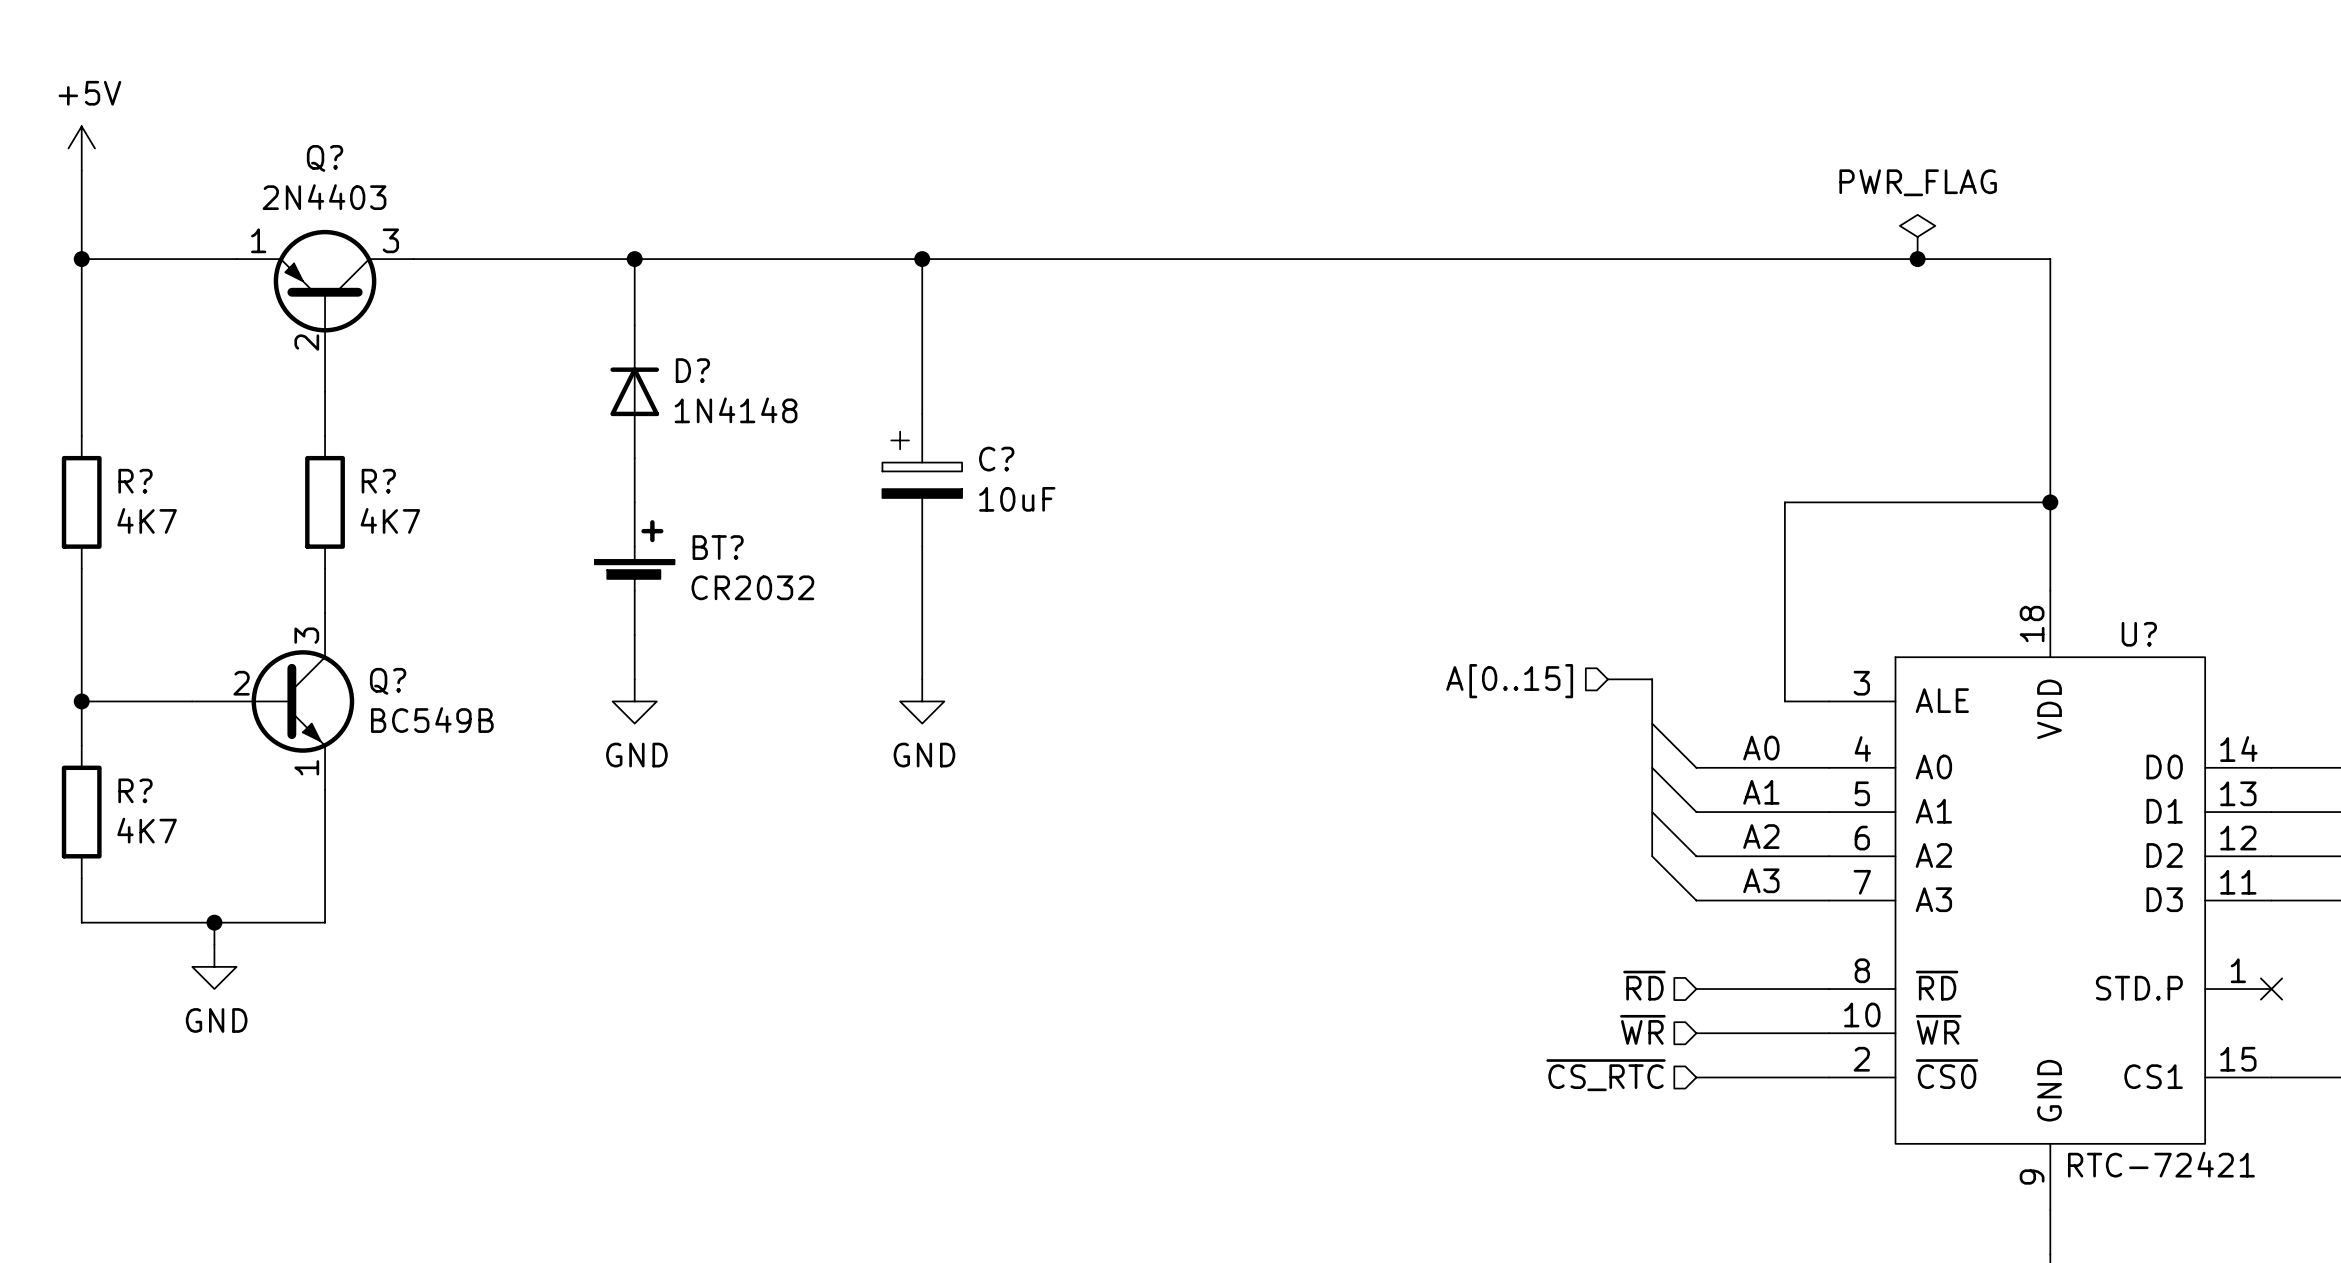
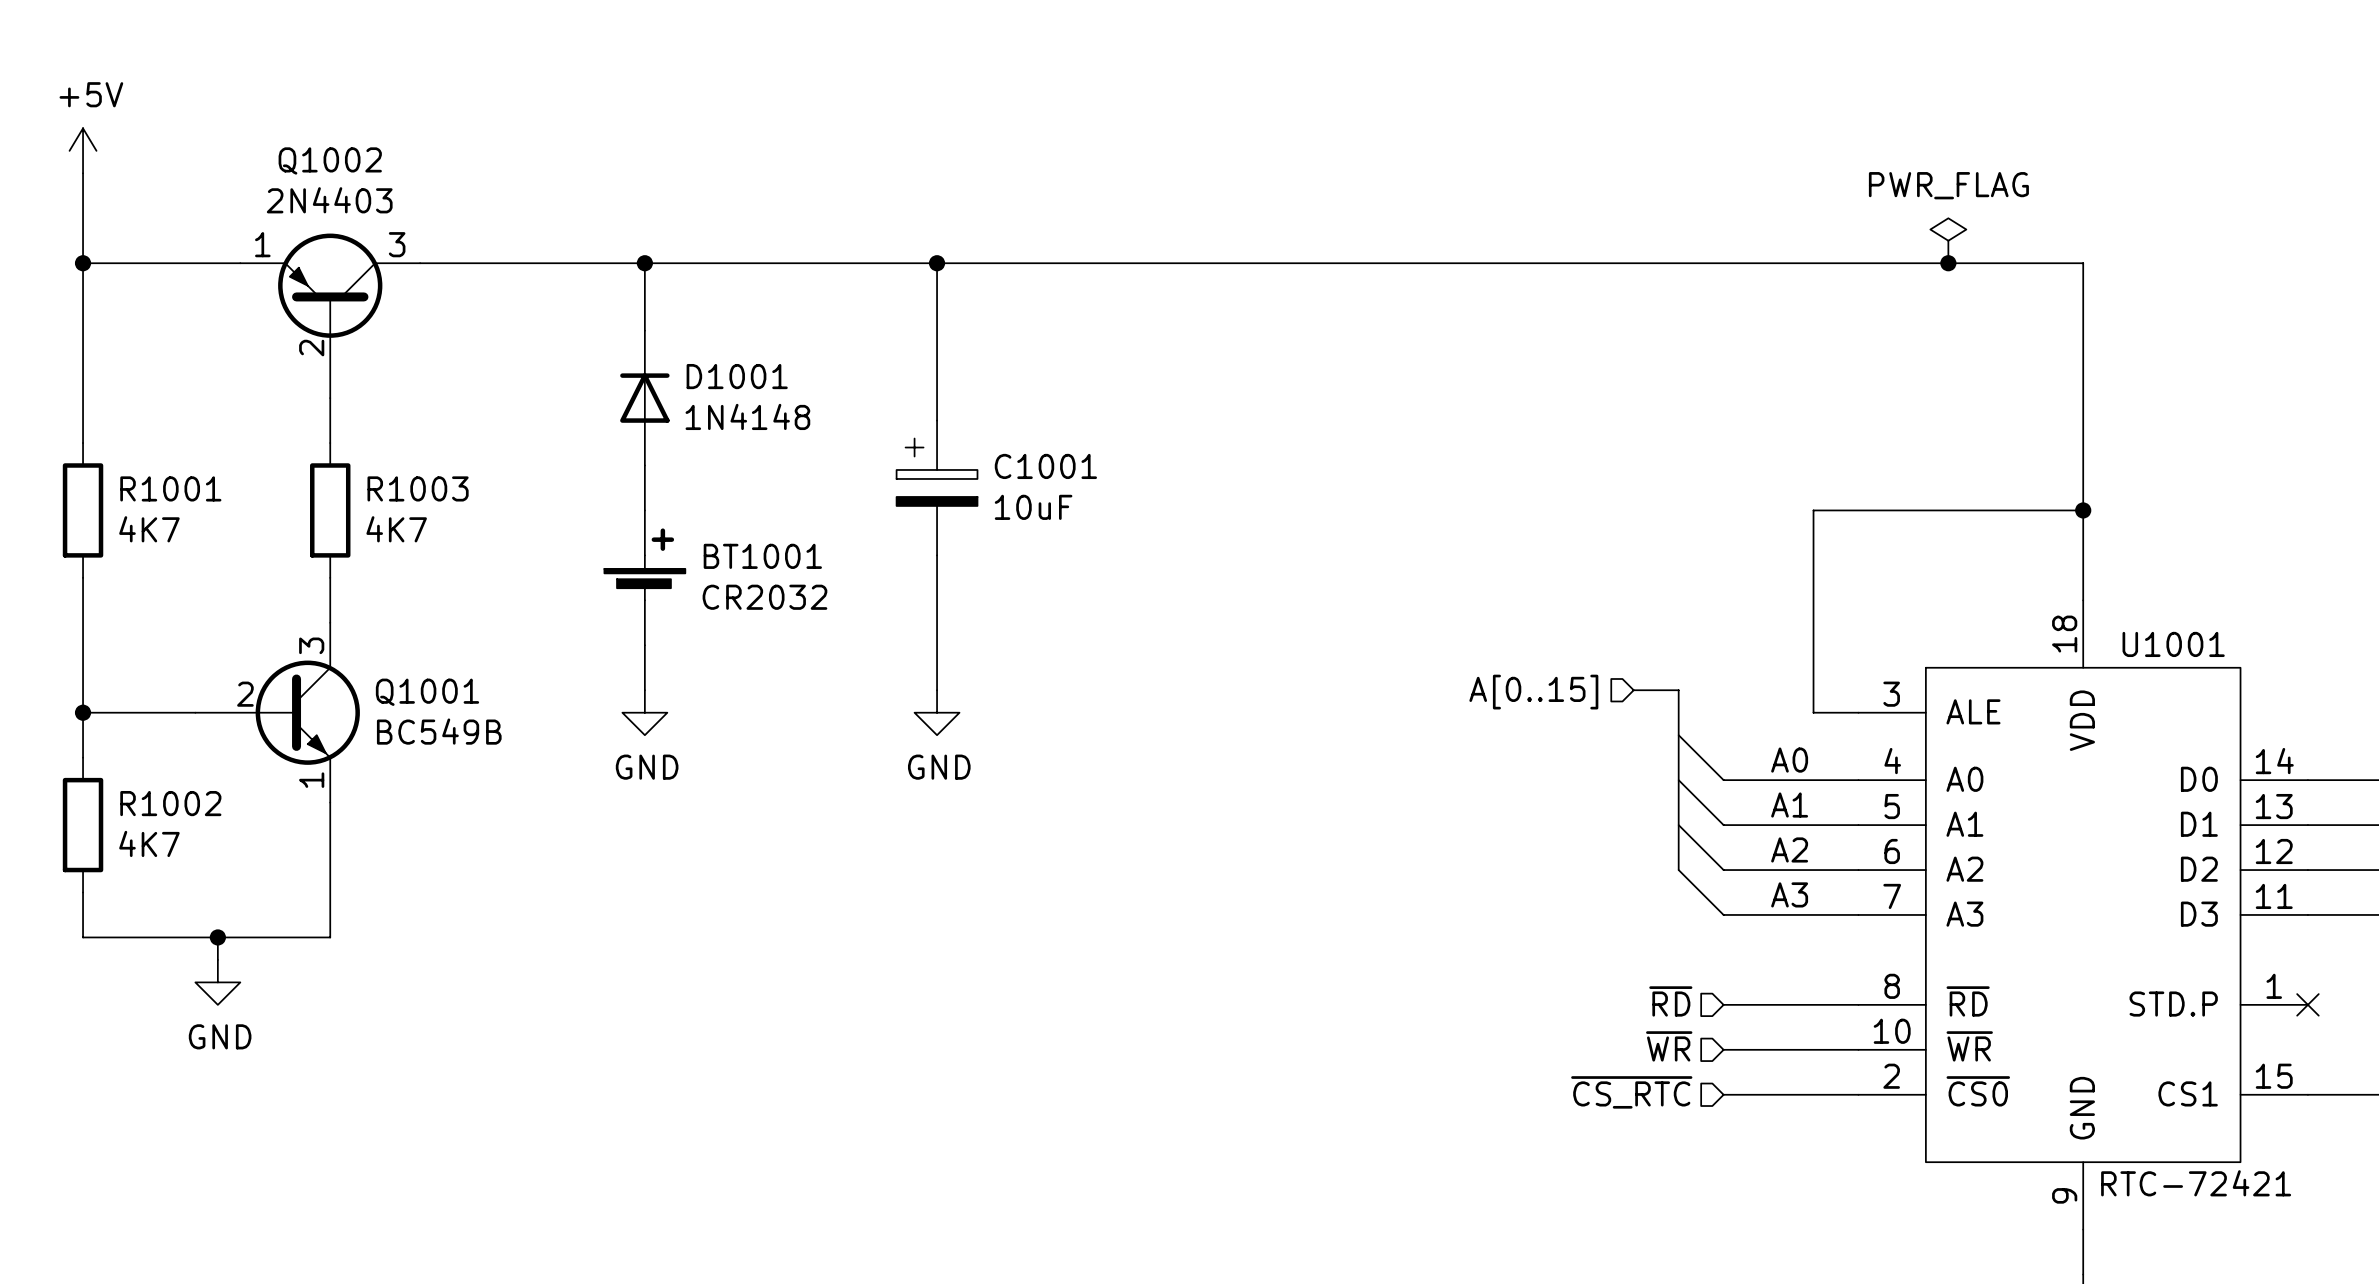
Q? name: Q? (325, 158) -> Q1002 (330, 160)
D? name: D? (692, 370) -> D1001 (737, 376)
C? name: C? (996, 459) -> C1001 (1045, 466)
R? name: R? (135, 481) -> R1001 (170, 488)
R? name: R? (378, 481) -> R1003 (418, 488)
BT? name: BT? (718, 547) -> BT1001 (762, 556)
U? name: U? (2139, 634) -> U1001 (2173, 644)
Q? name: Q? (388, 681) -> Q1001 (427, 692)
R? name: R? (135, 790) -> R1002 (170, 803)

